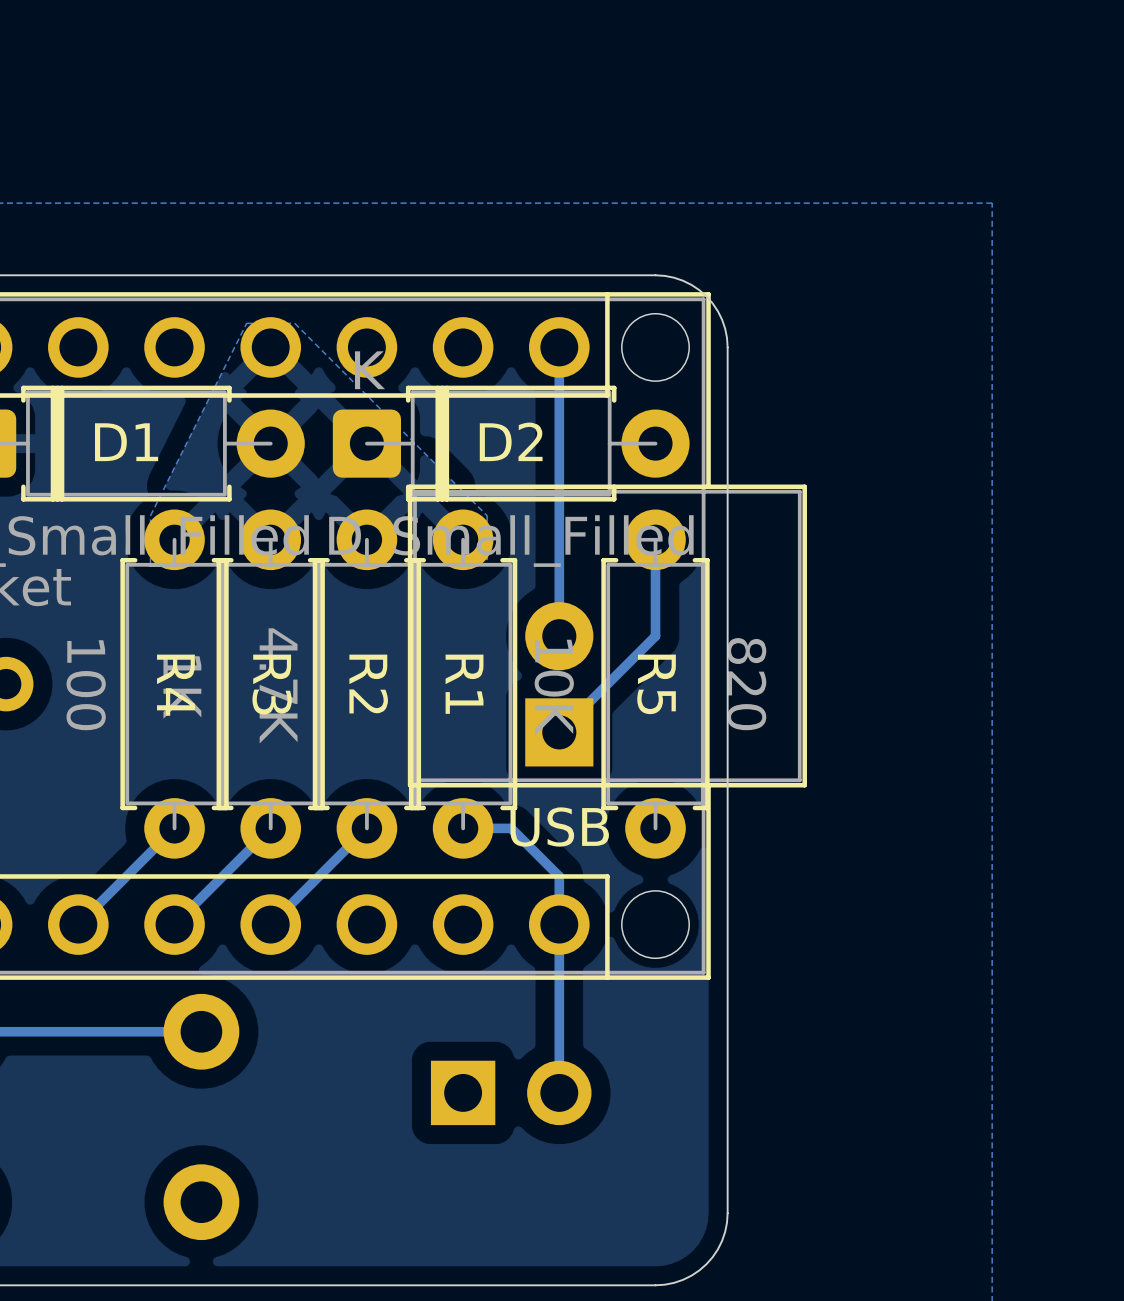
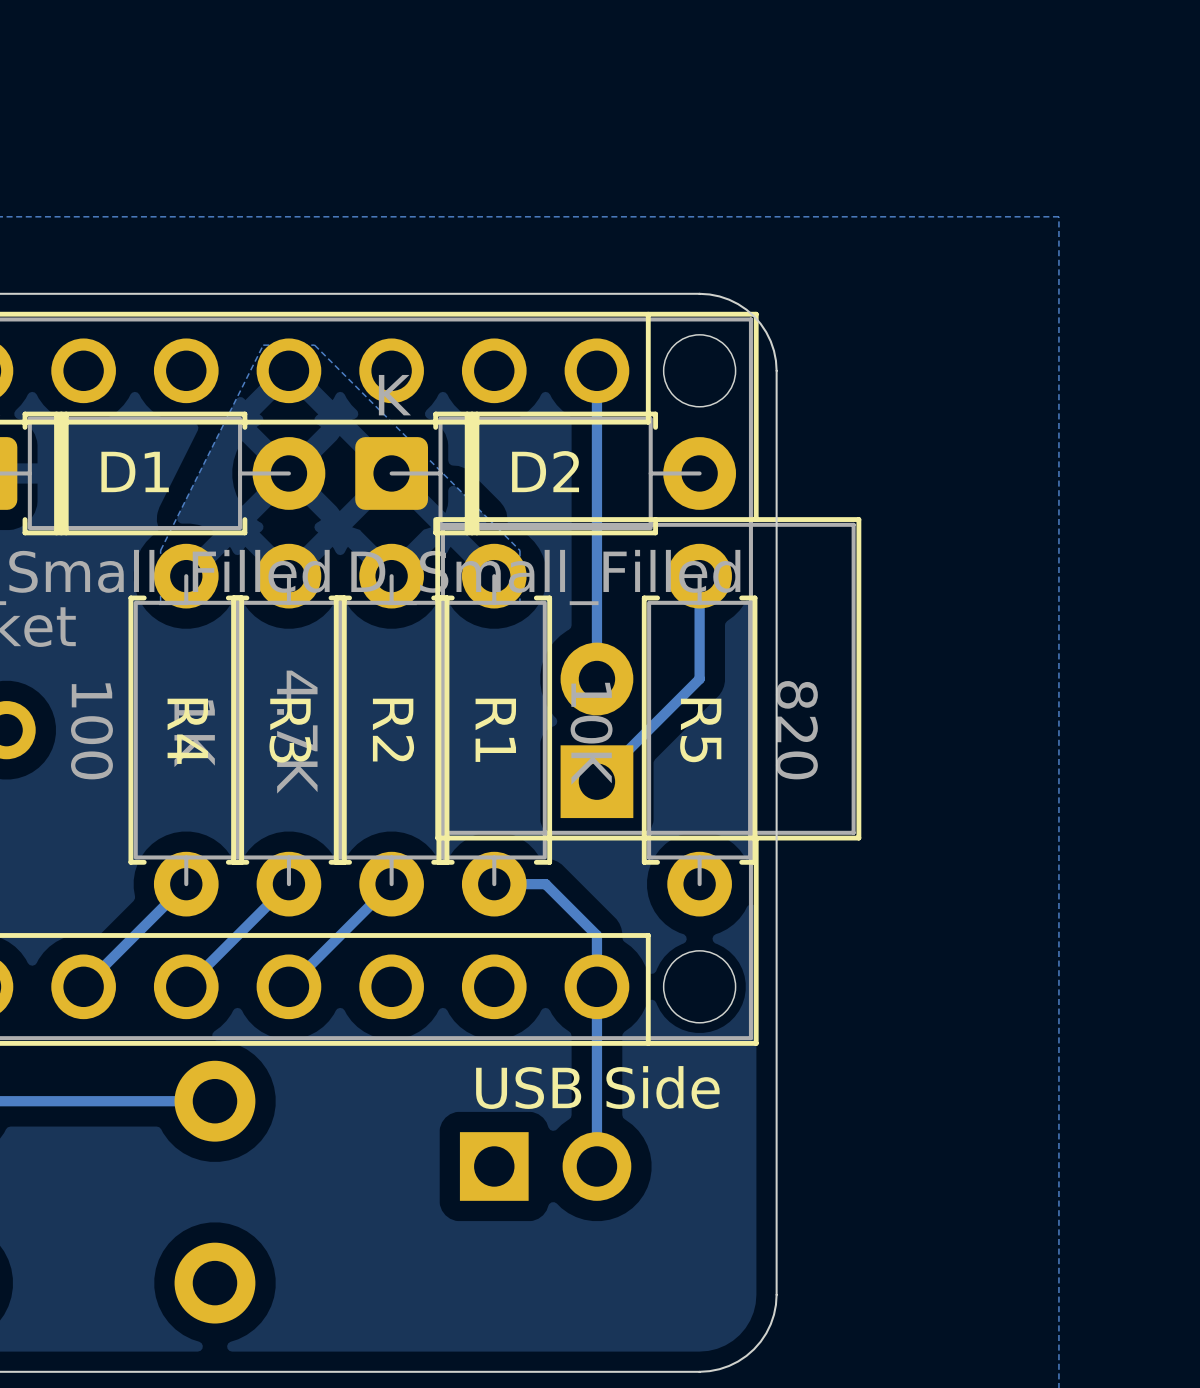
part text: USB (559, 827) -> none
part text: none -> USB Side (597, 1087)

